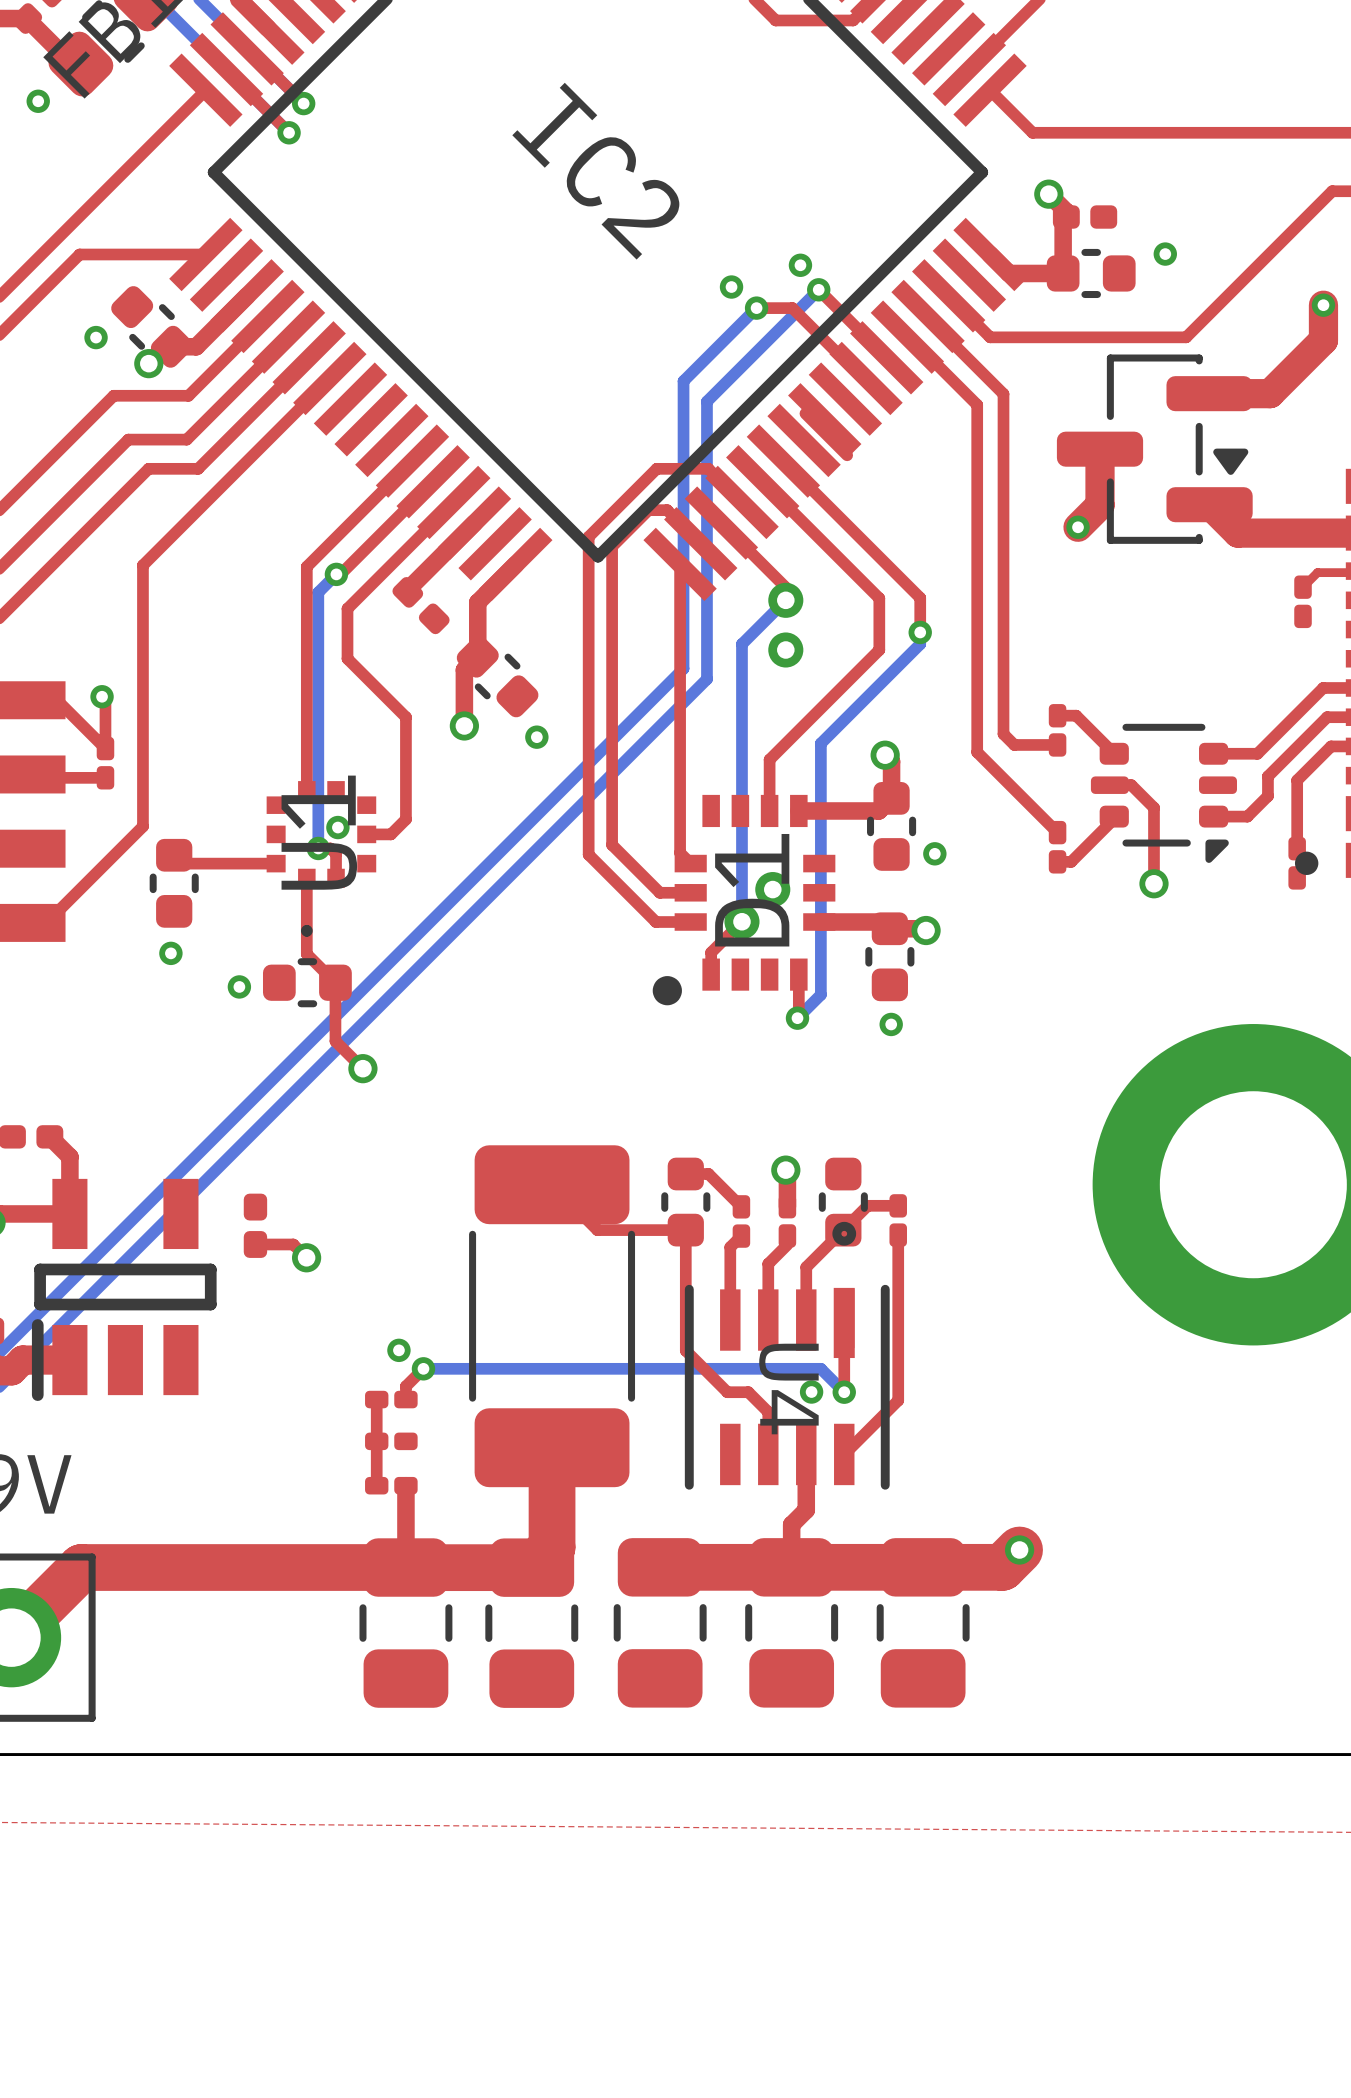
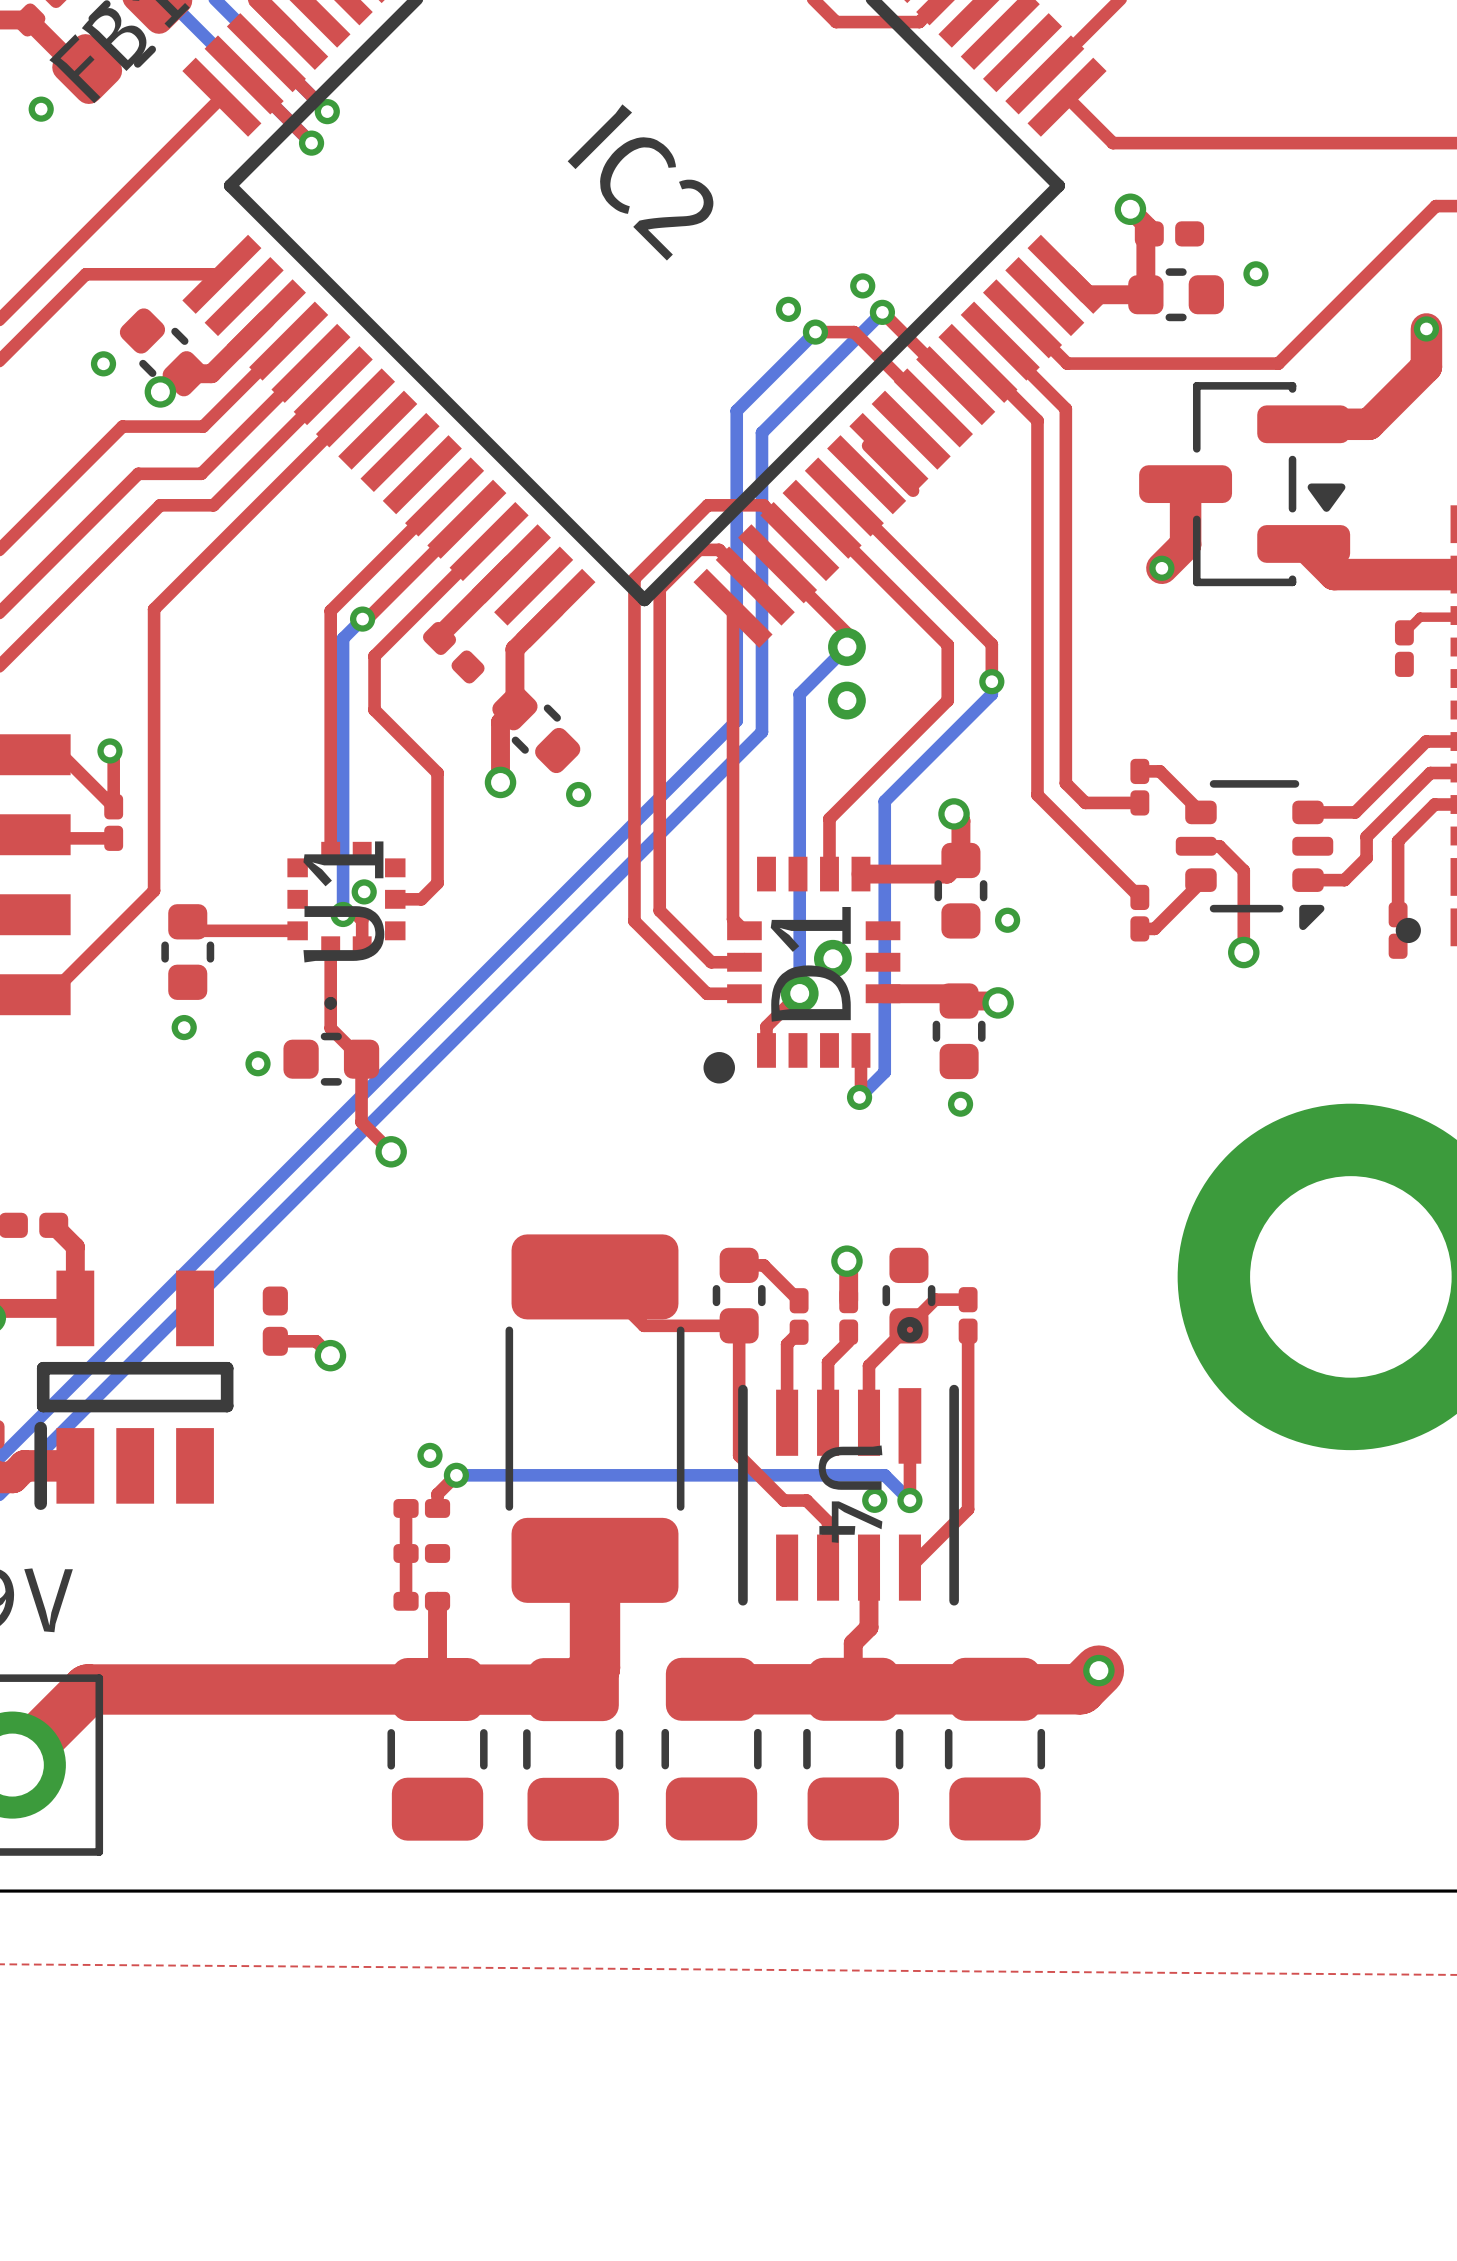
top track: (988, 379) (1003, 394) (1003, 734) (1014, 744) -> (1065, 408) (1065, 783) (1085, 802) (1093, 802)
top track: (962, 390) (977, 404) (977, 752) -> (1037, 420) (1037, 795) (1053, 810)

